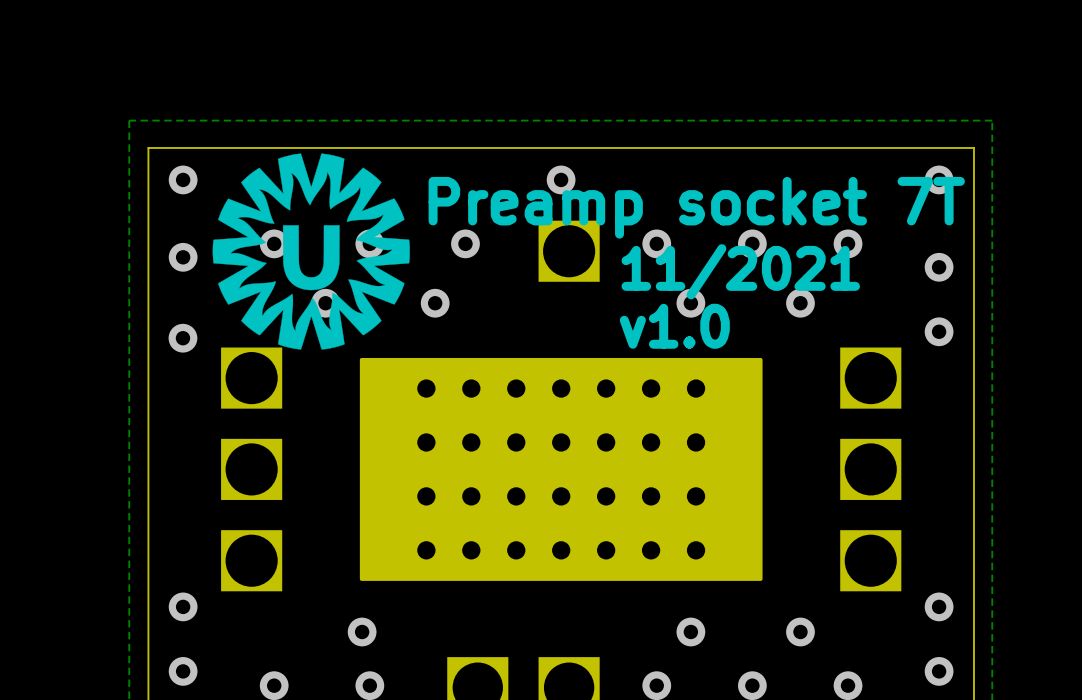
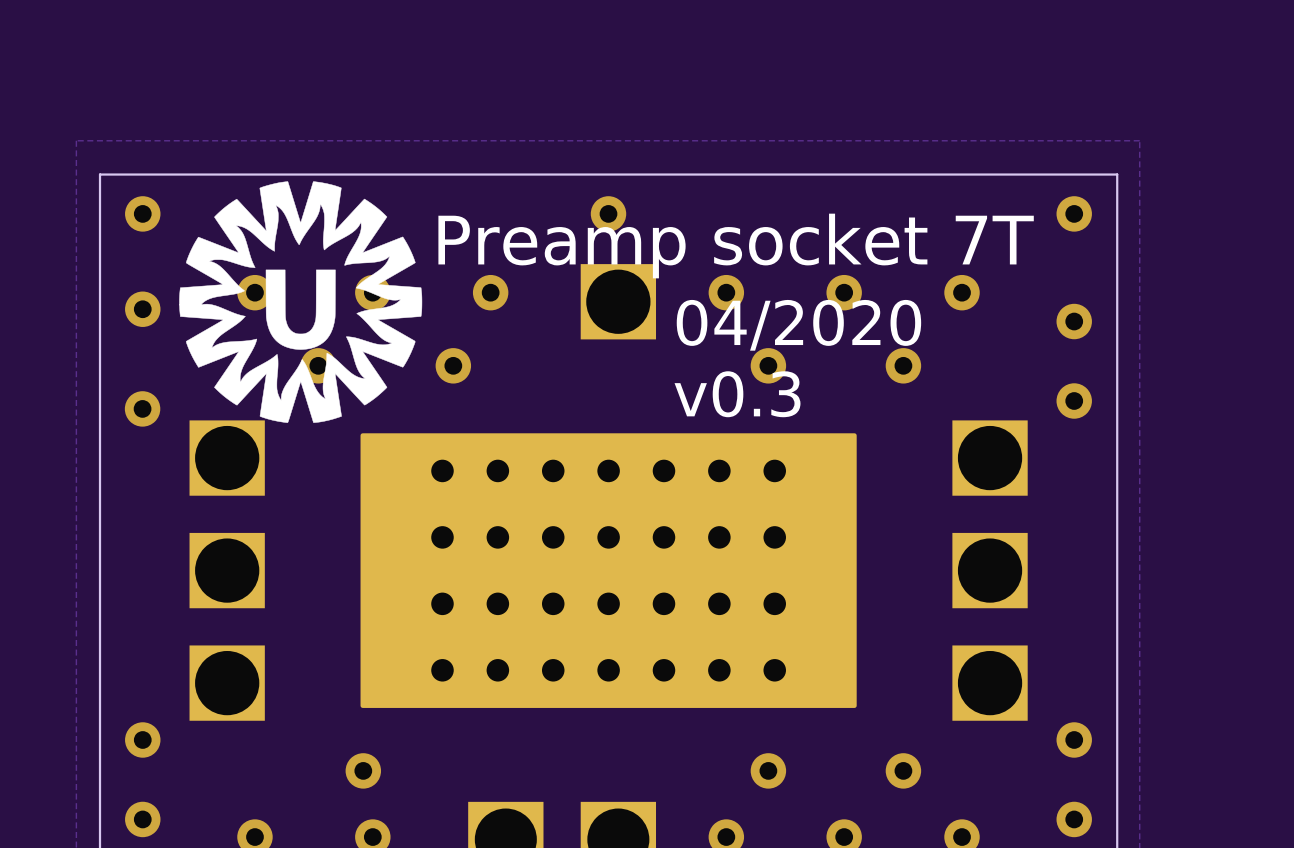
text: 11/2021 (740, 271) -> 04/2020 (798, 325)
text: v1.0 (674, 326) -> v0.3 (737, 394)

